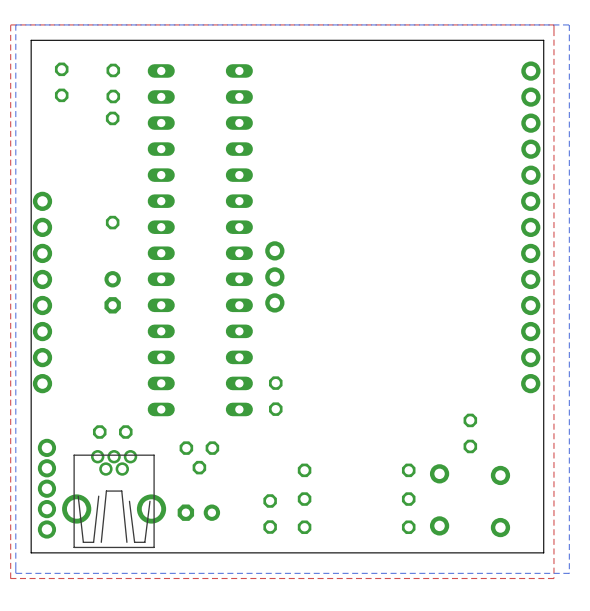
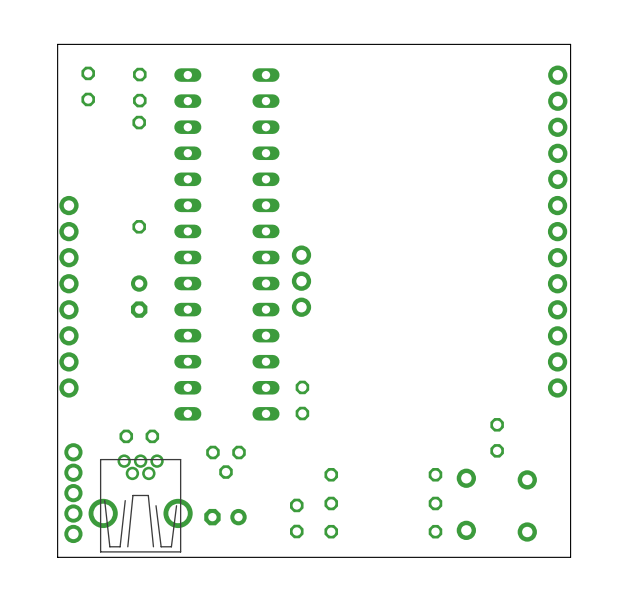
top zone outline: (553, 24) (553, 578) (10, 578) (10, 24) (553, 24) -> none
bottom zone outline: (569, 24) (569, 573) (15, 573) (15, 24) (569, 24) -> none

